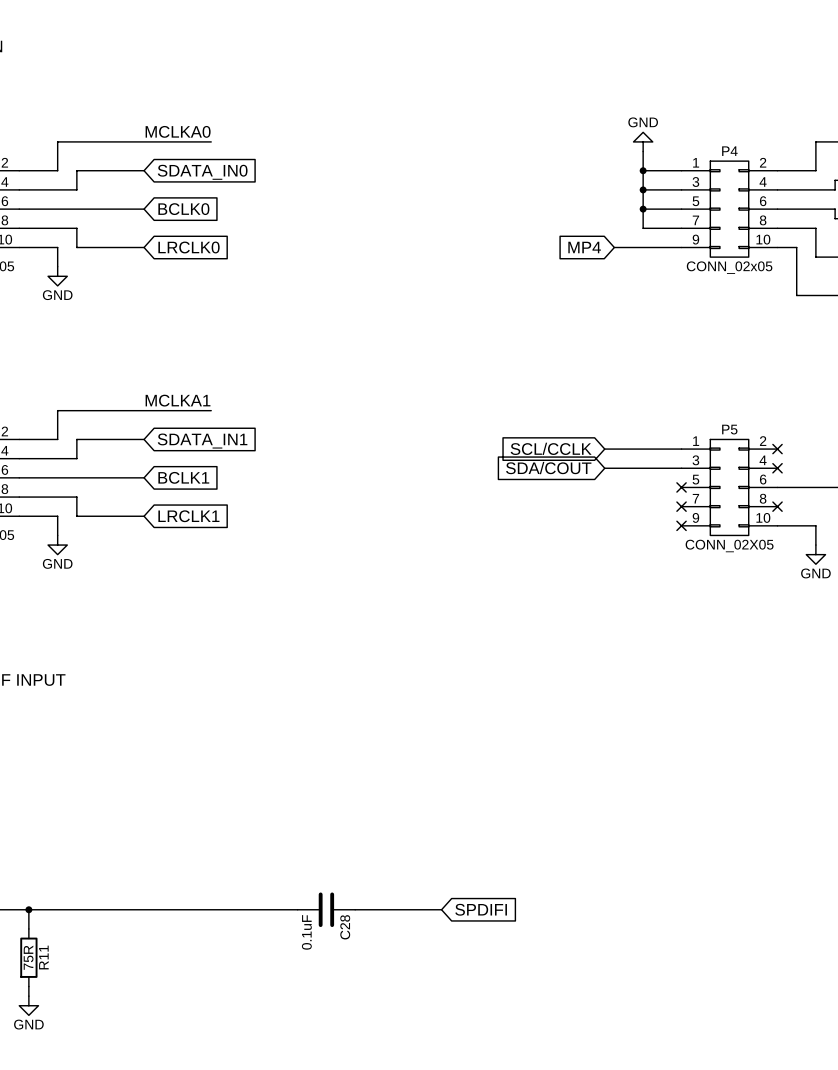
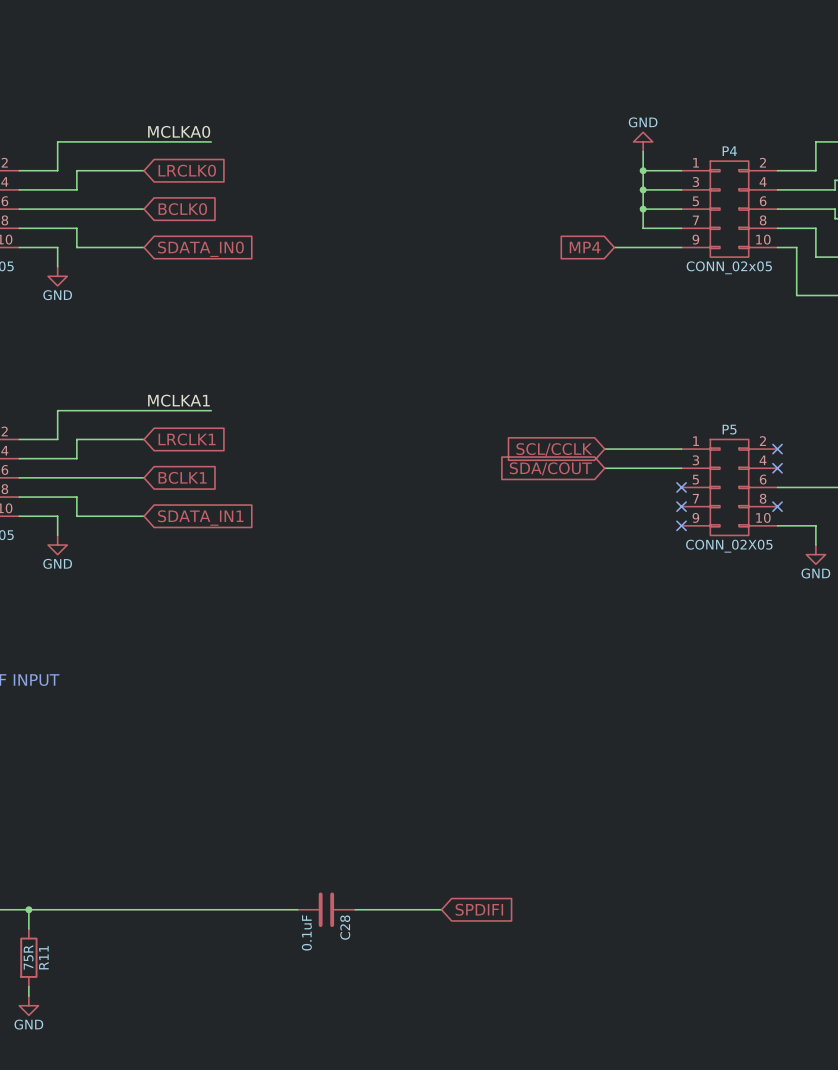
global label: SDATA_IN0 (202, 172) -> LRCLK0 (187, 170)
global label: LRCLK0 (189, 247) -> SDATA_IN0 (200, 249)
global label: SDATA_IN1 (202, 441) -> LRCLK1 (187, 439)
global label: LRCLK1 (188, 516) -> SDATA_IN1 (200, 518)

